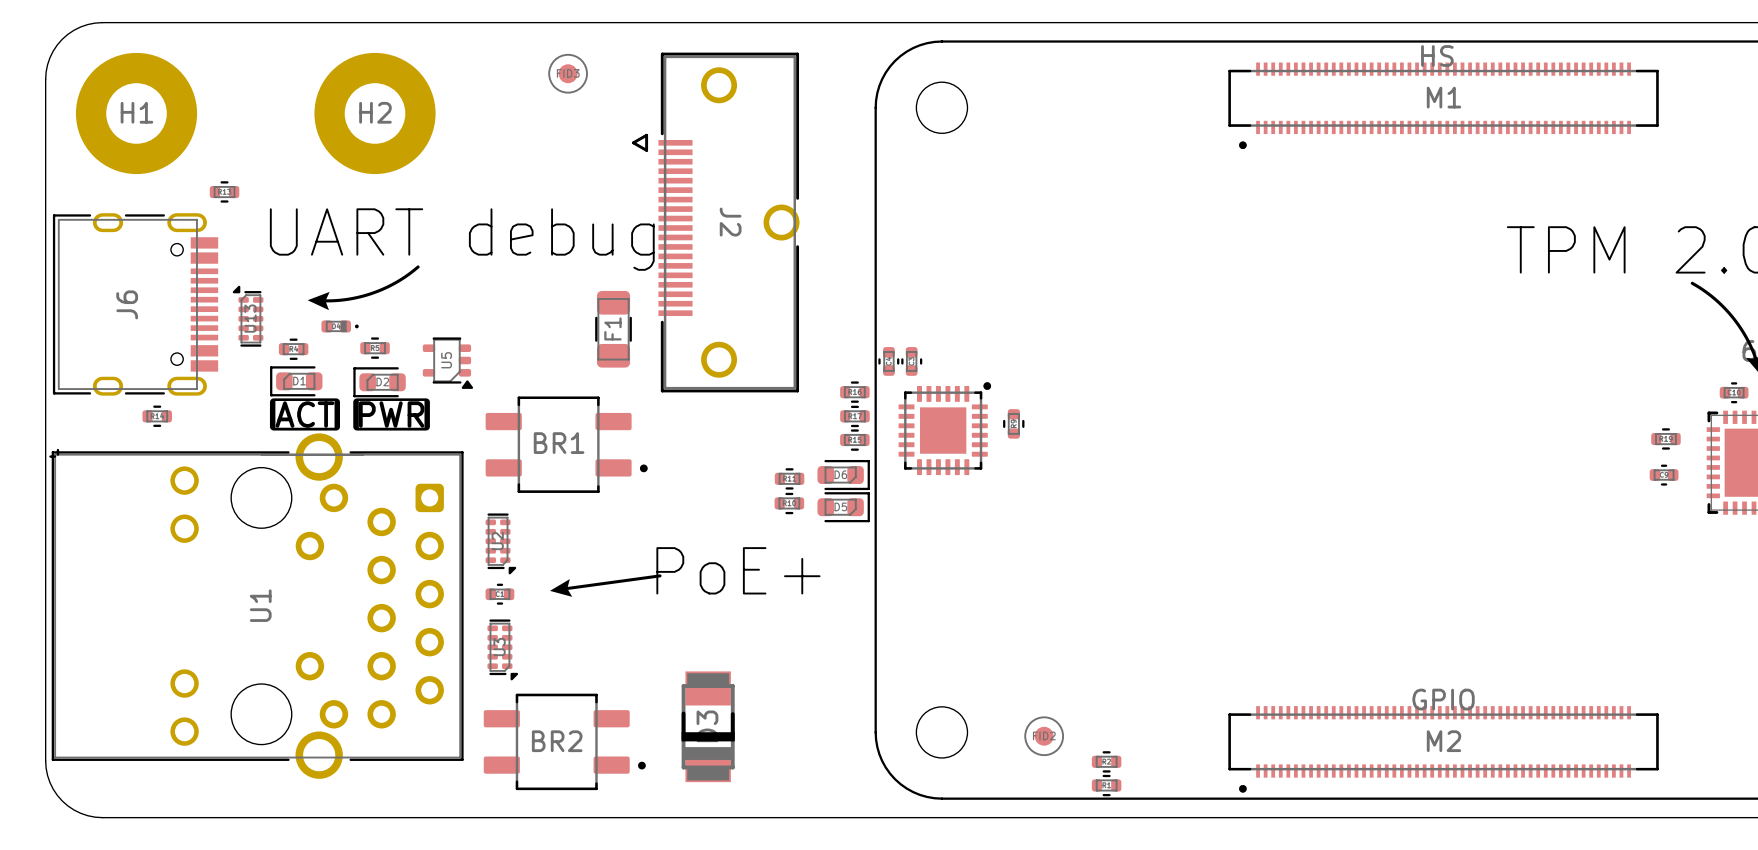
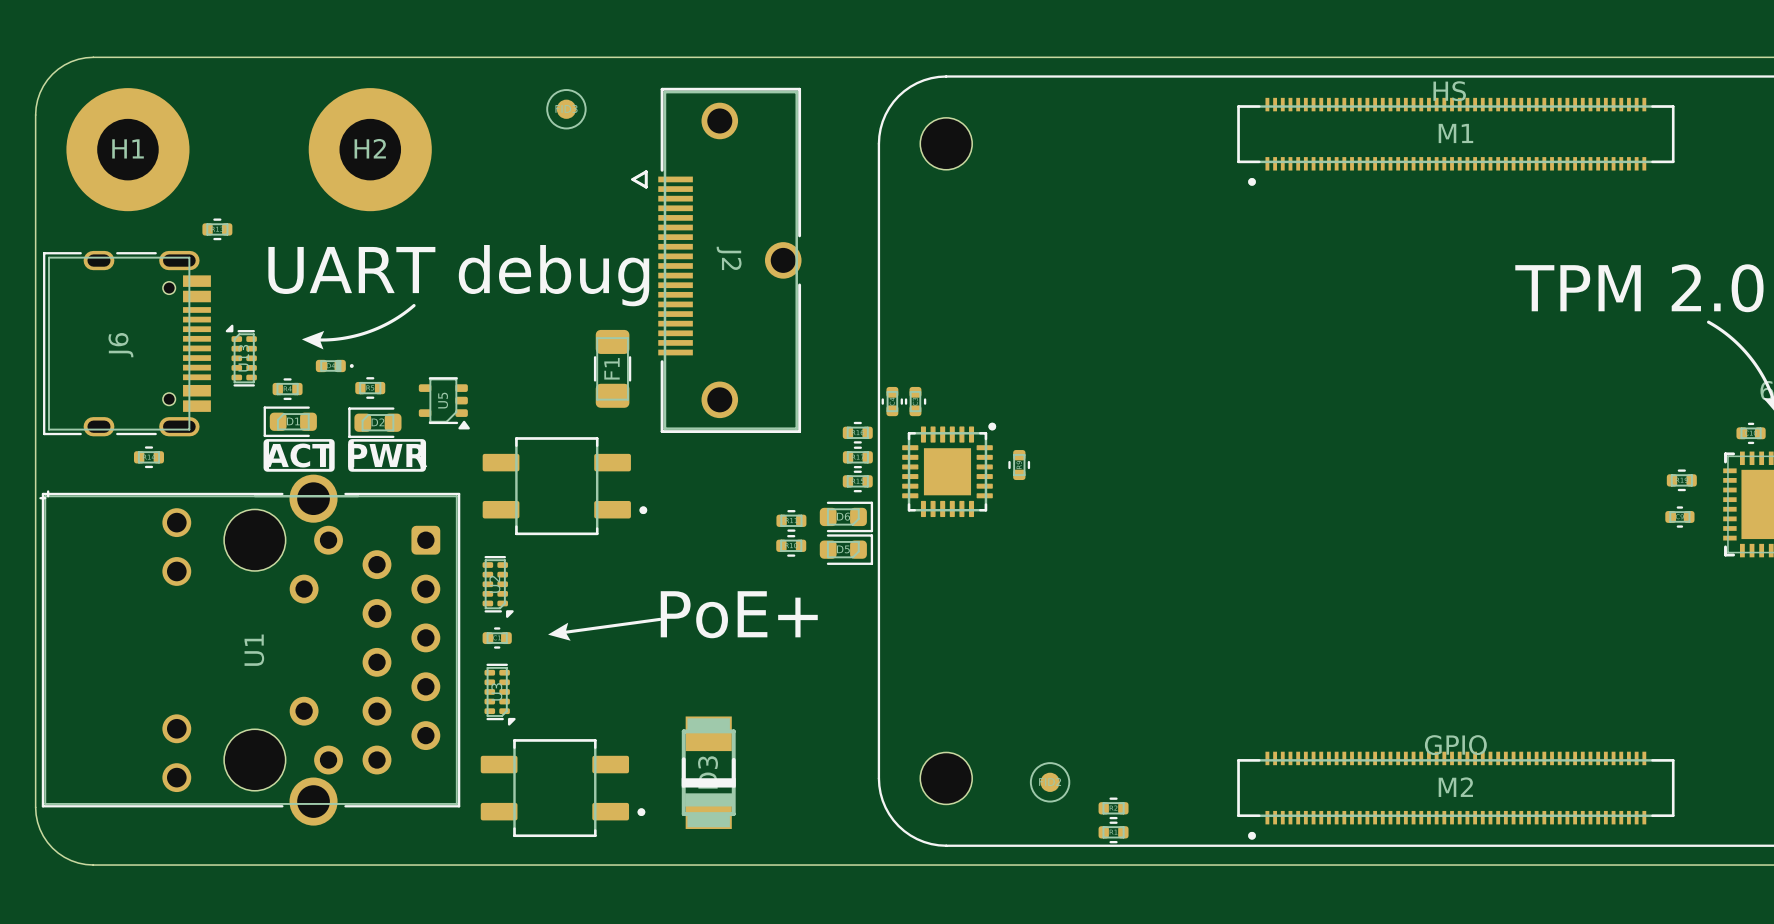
BR1 name: BR1 (559, 443) -> none
BR2 name: BR2 (557, 741) -> none

